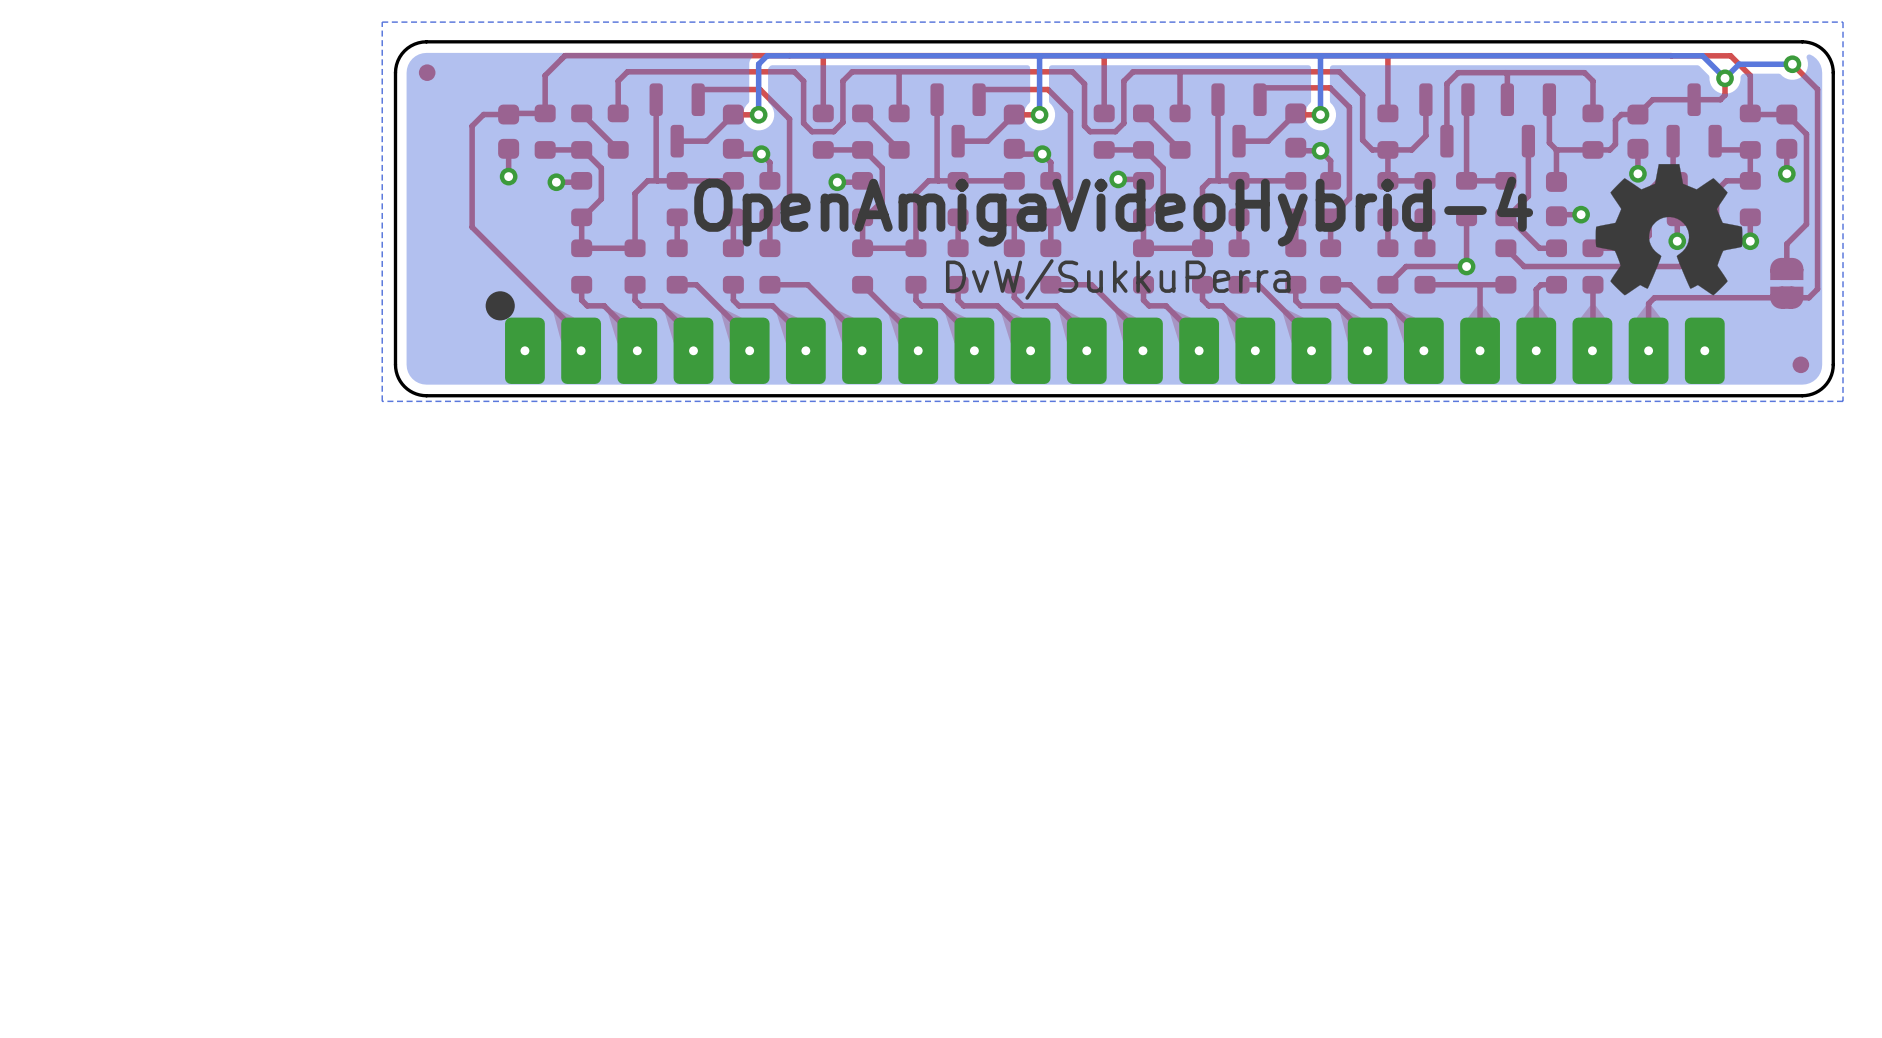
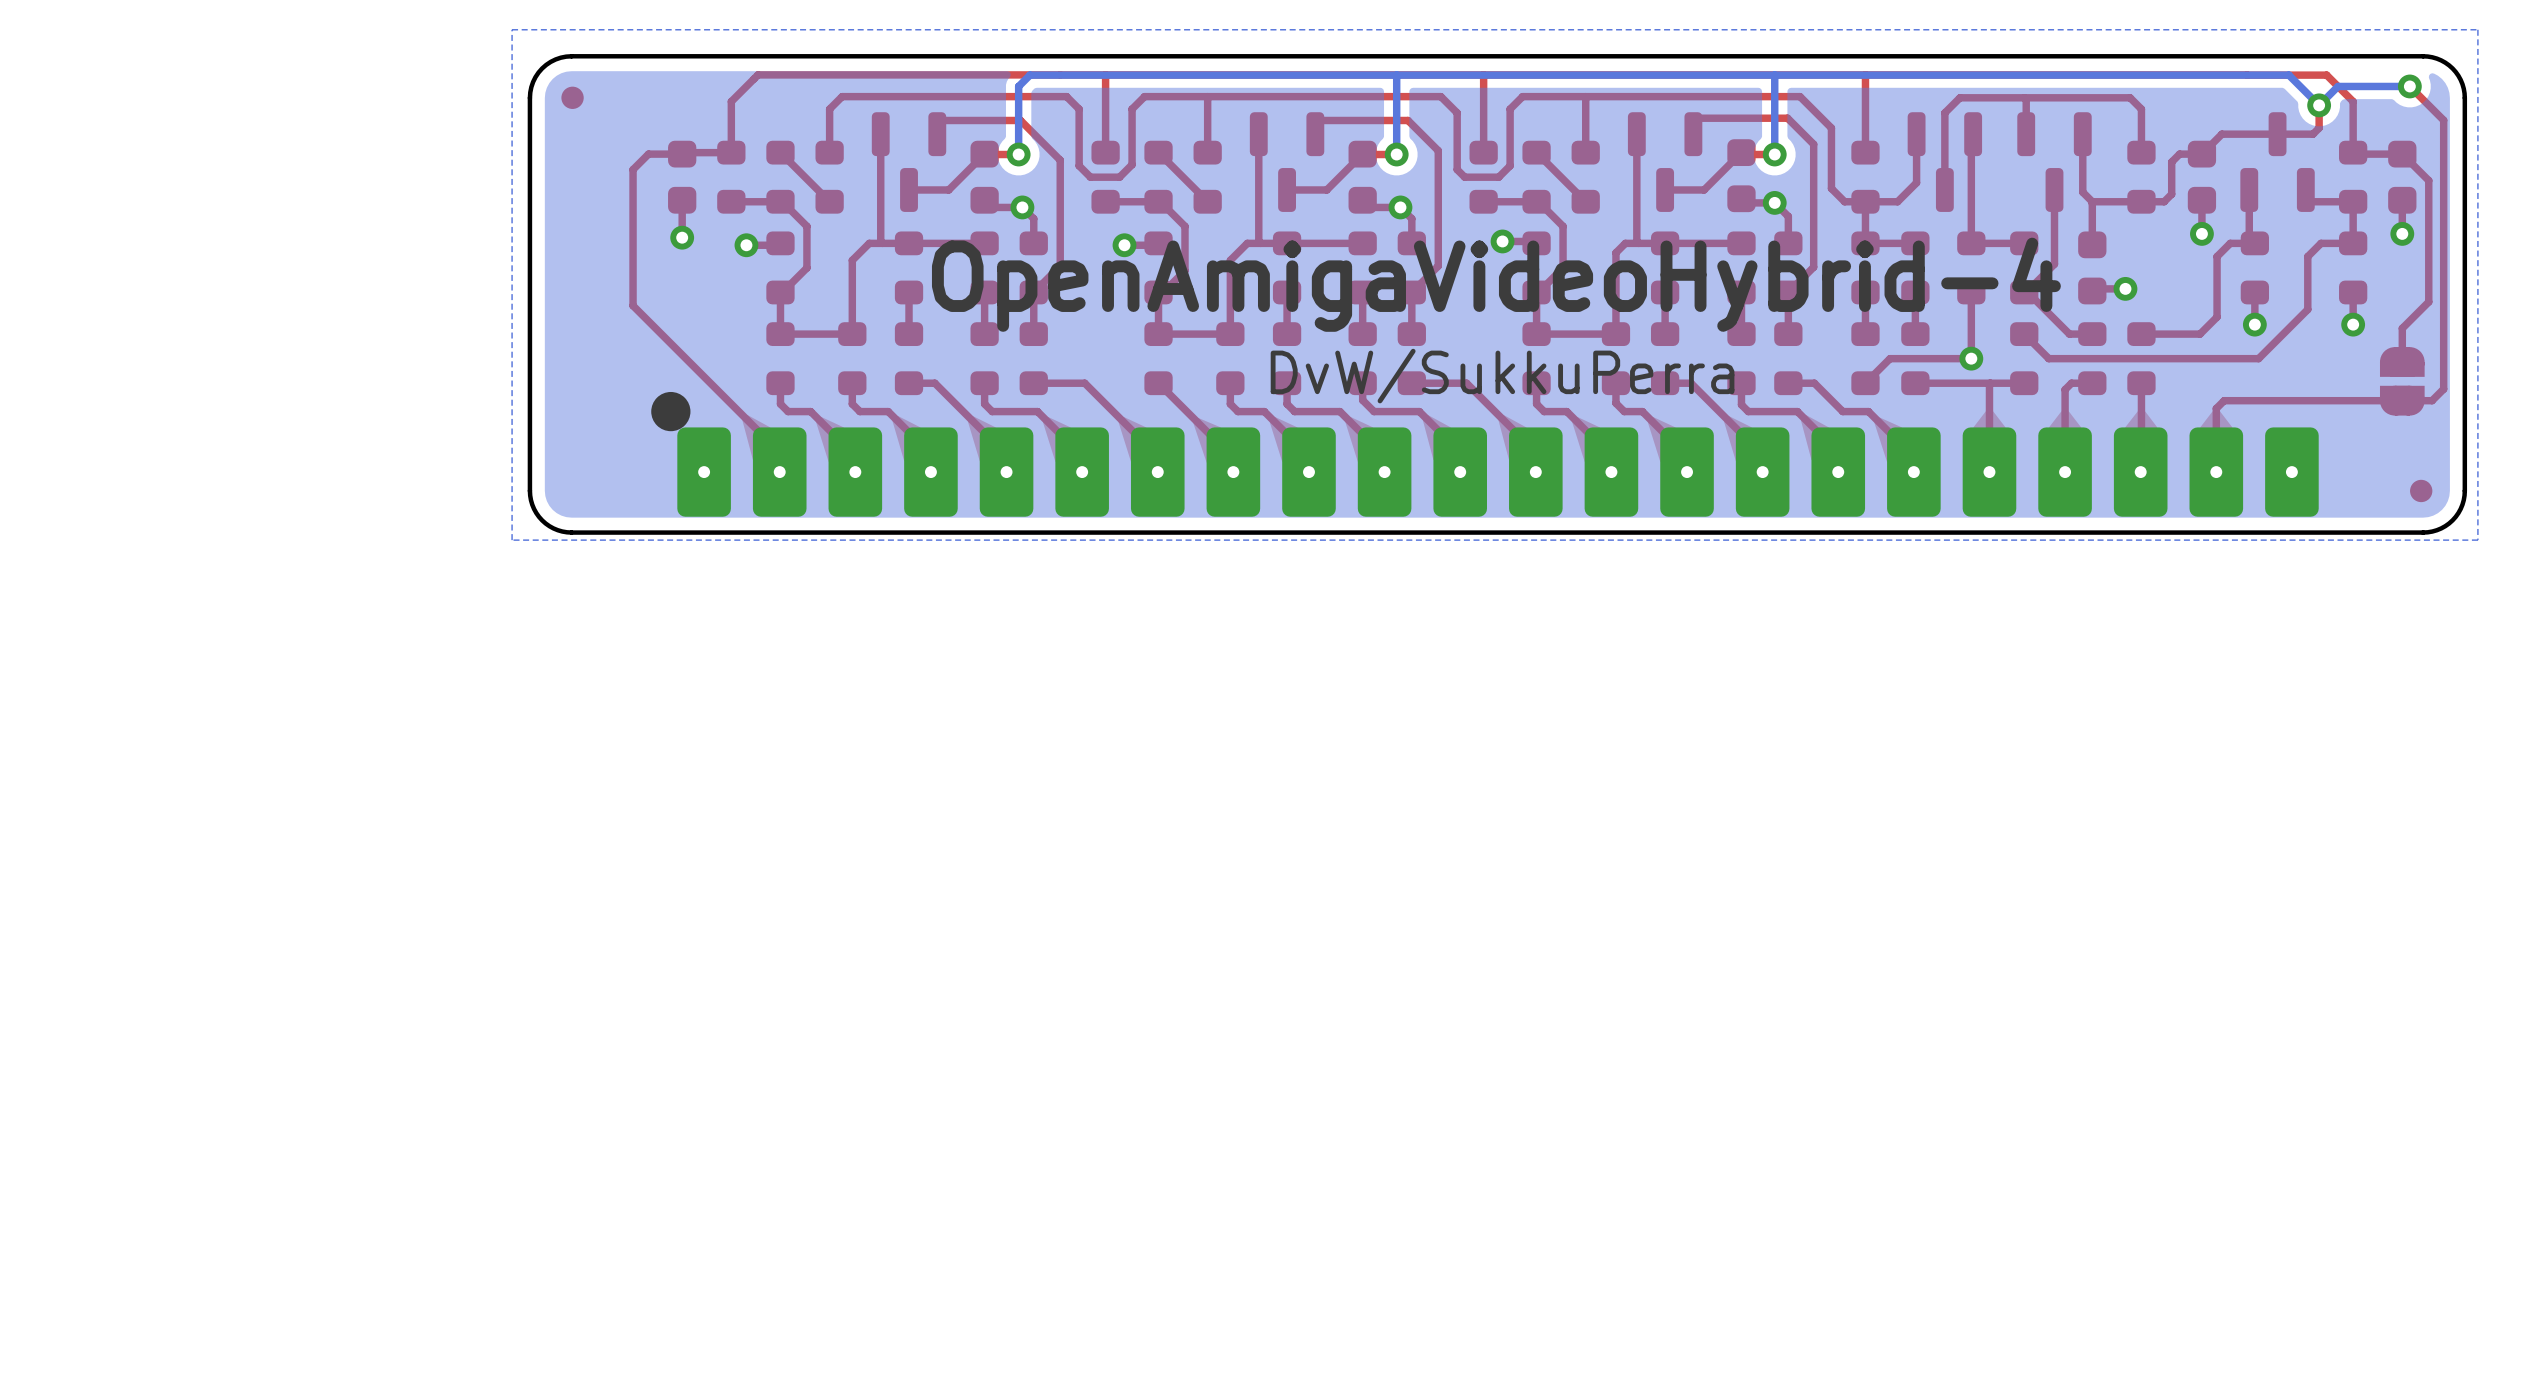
drawing: [1595, 164, 1743, 296] -> none

